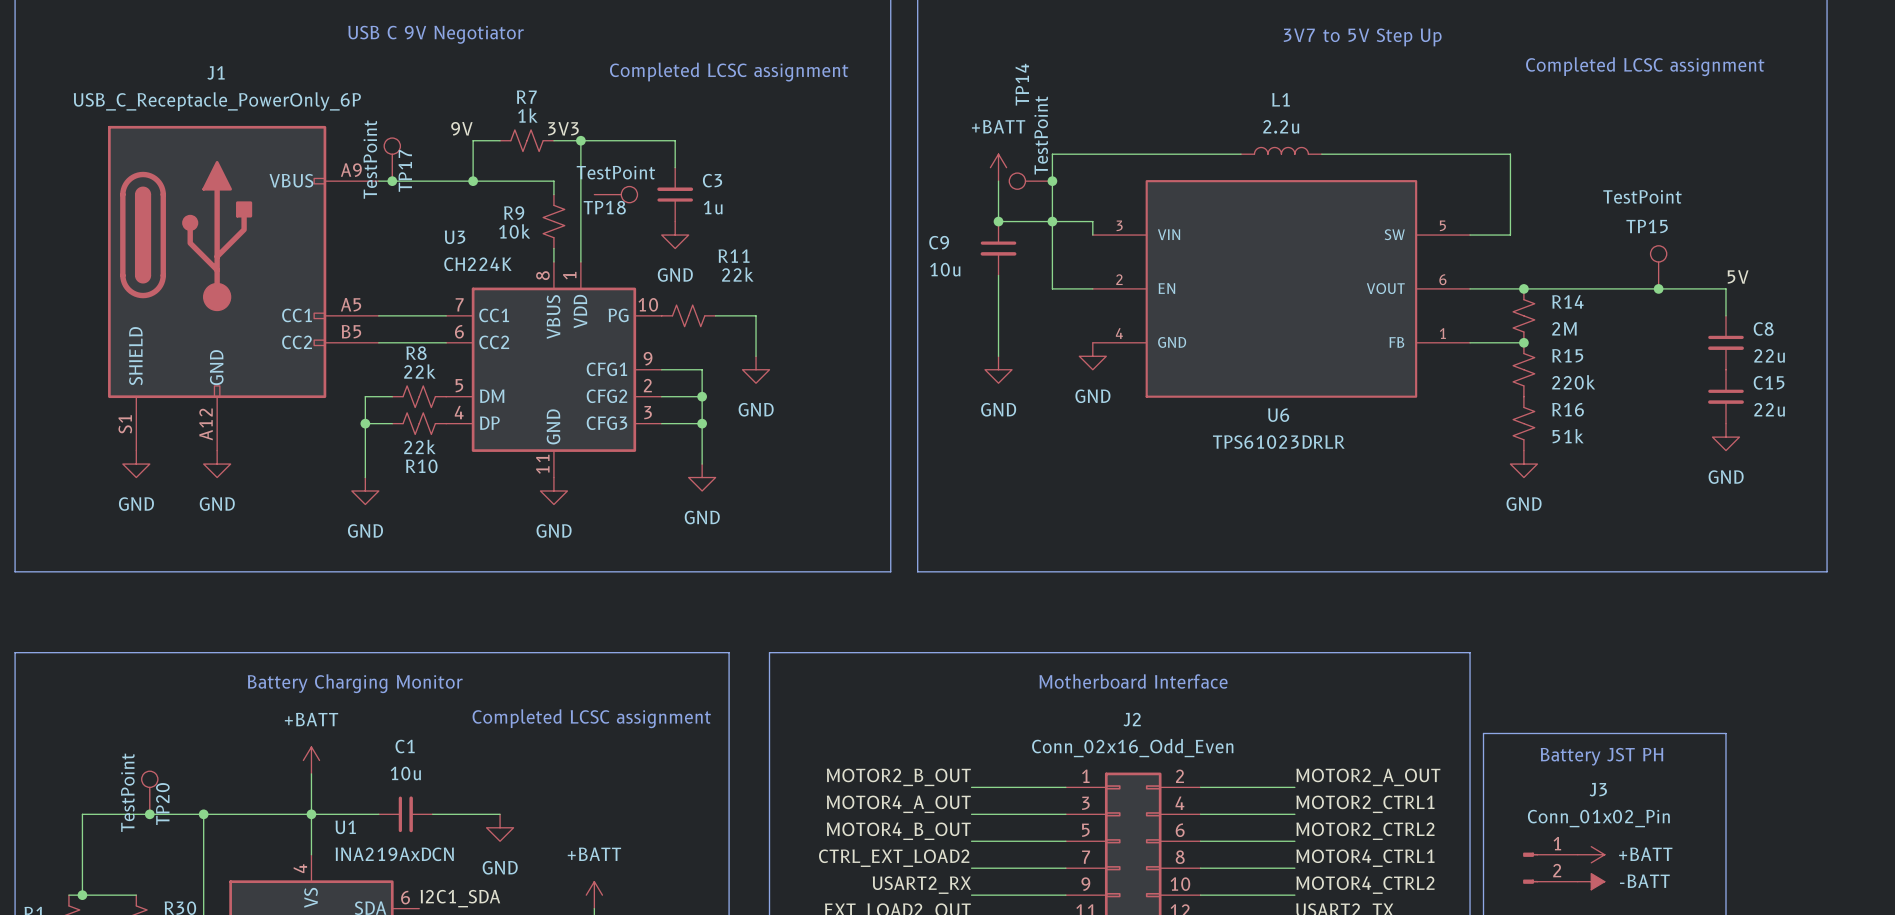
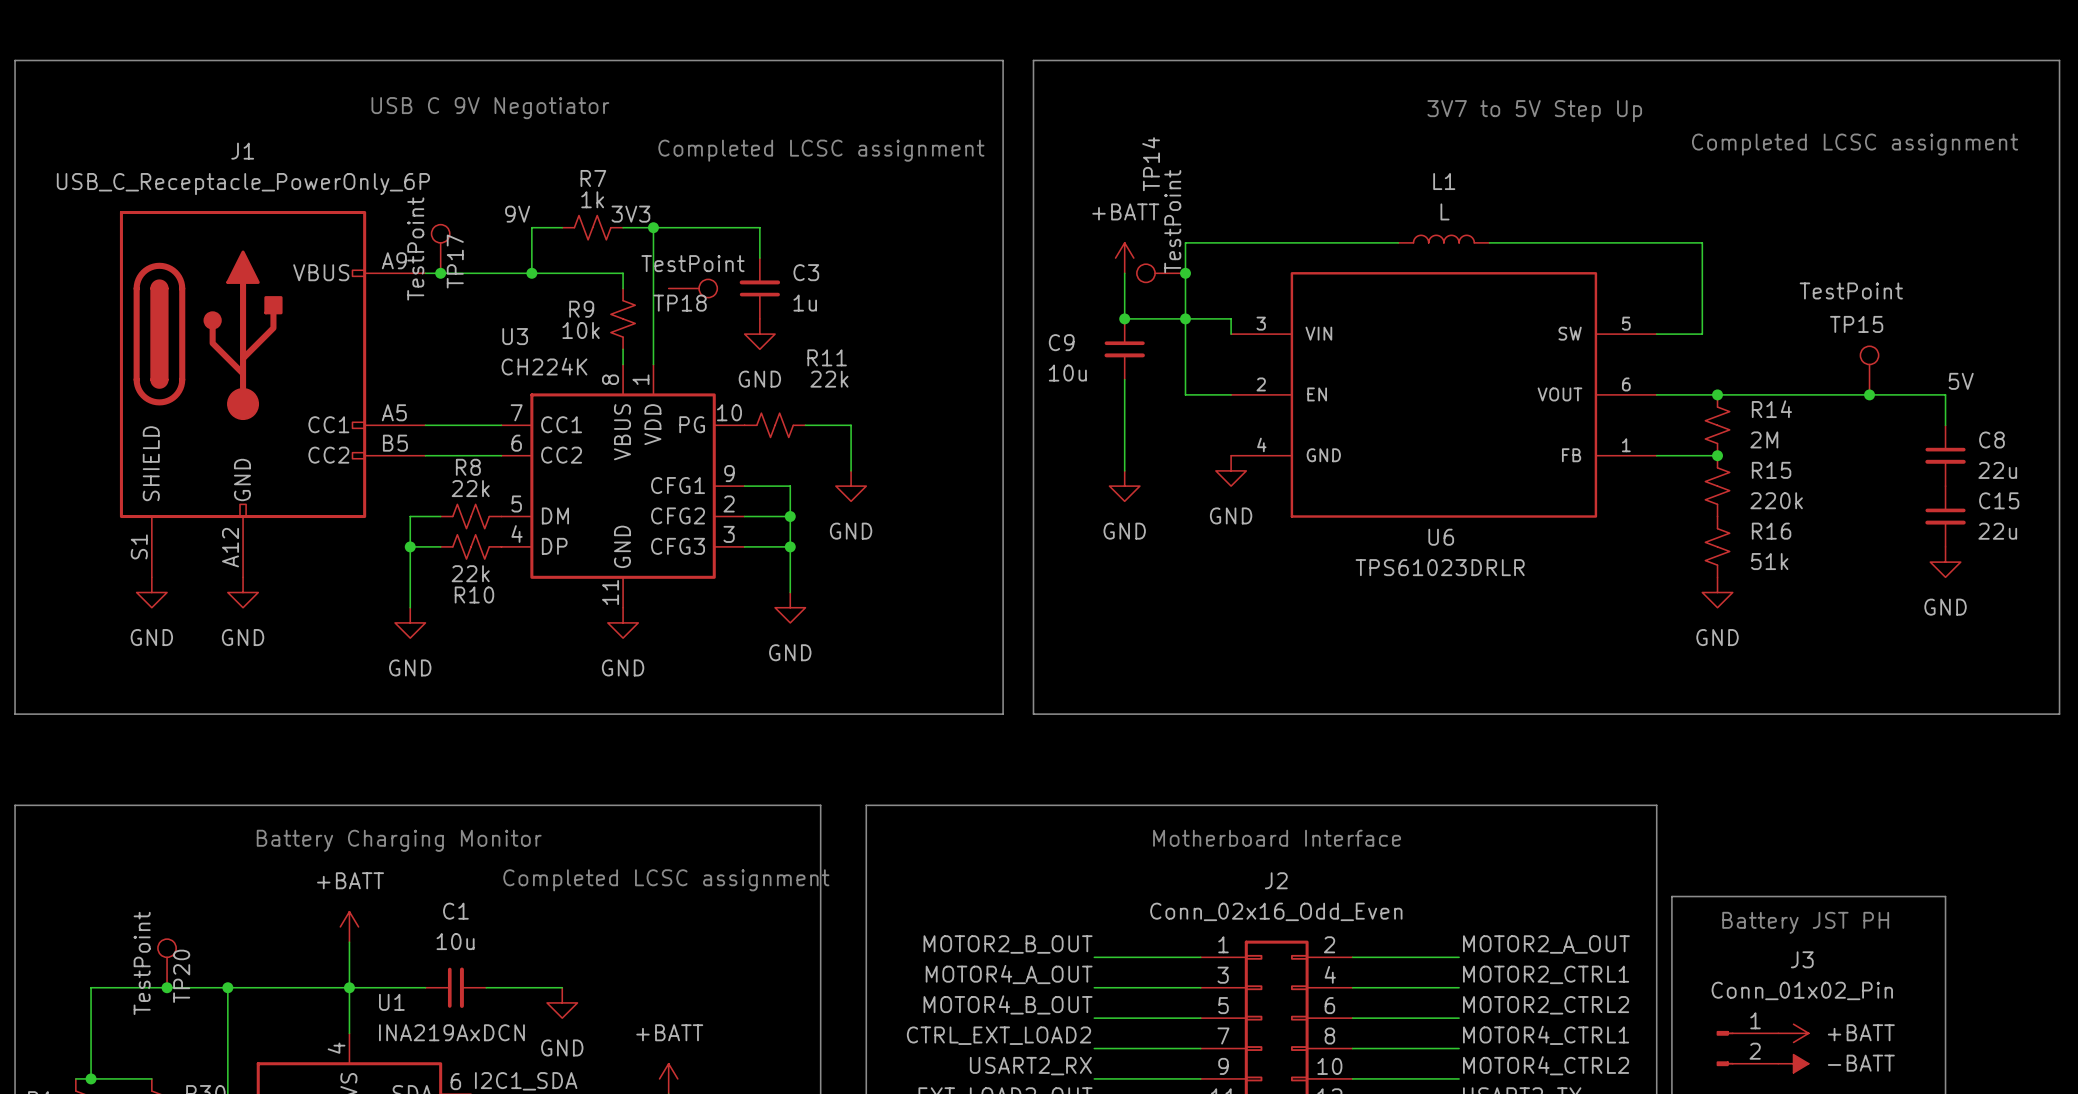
L1 value: 2.2u (1281, 126) -> L (1444, 211)

